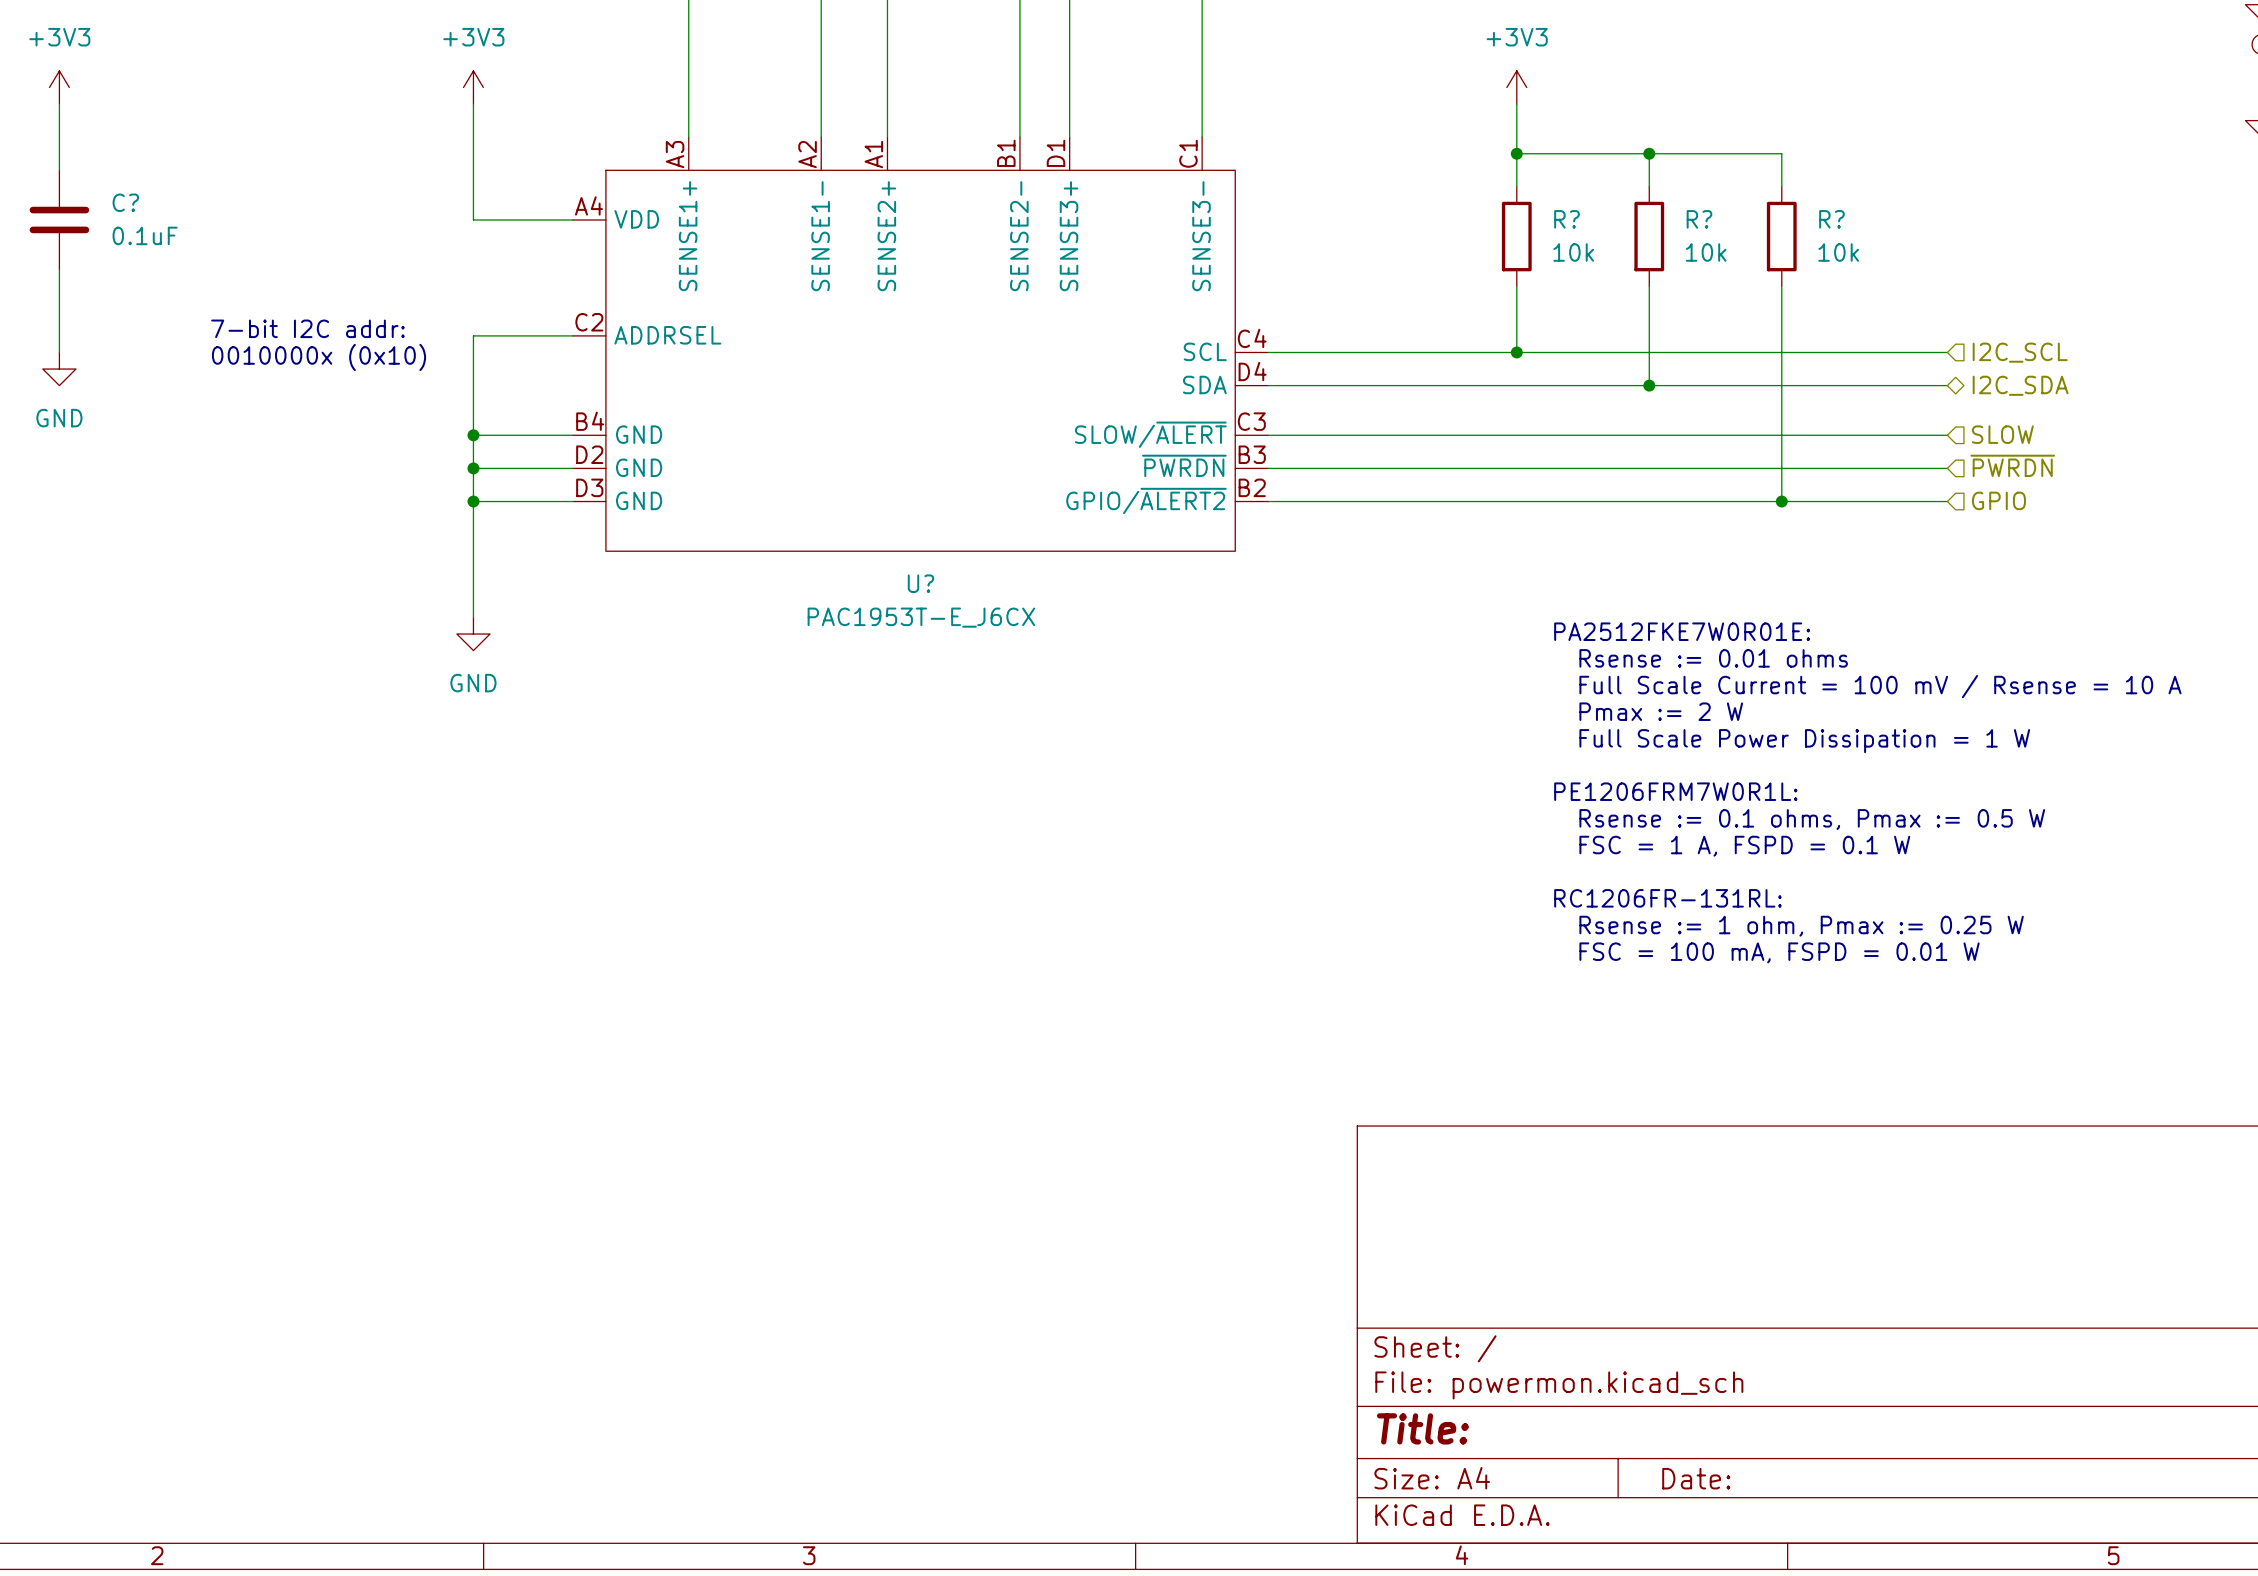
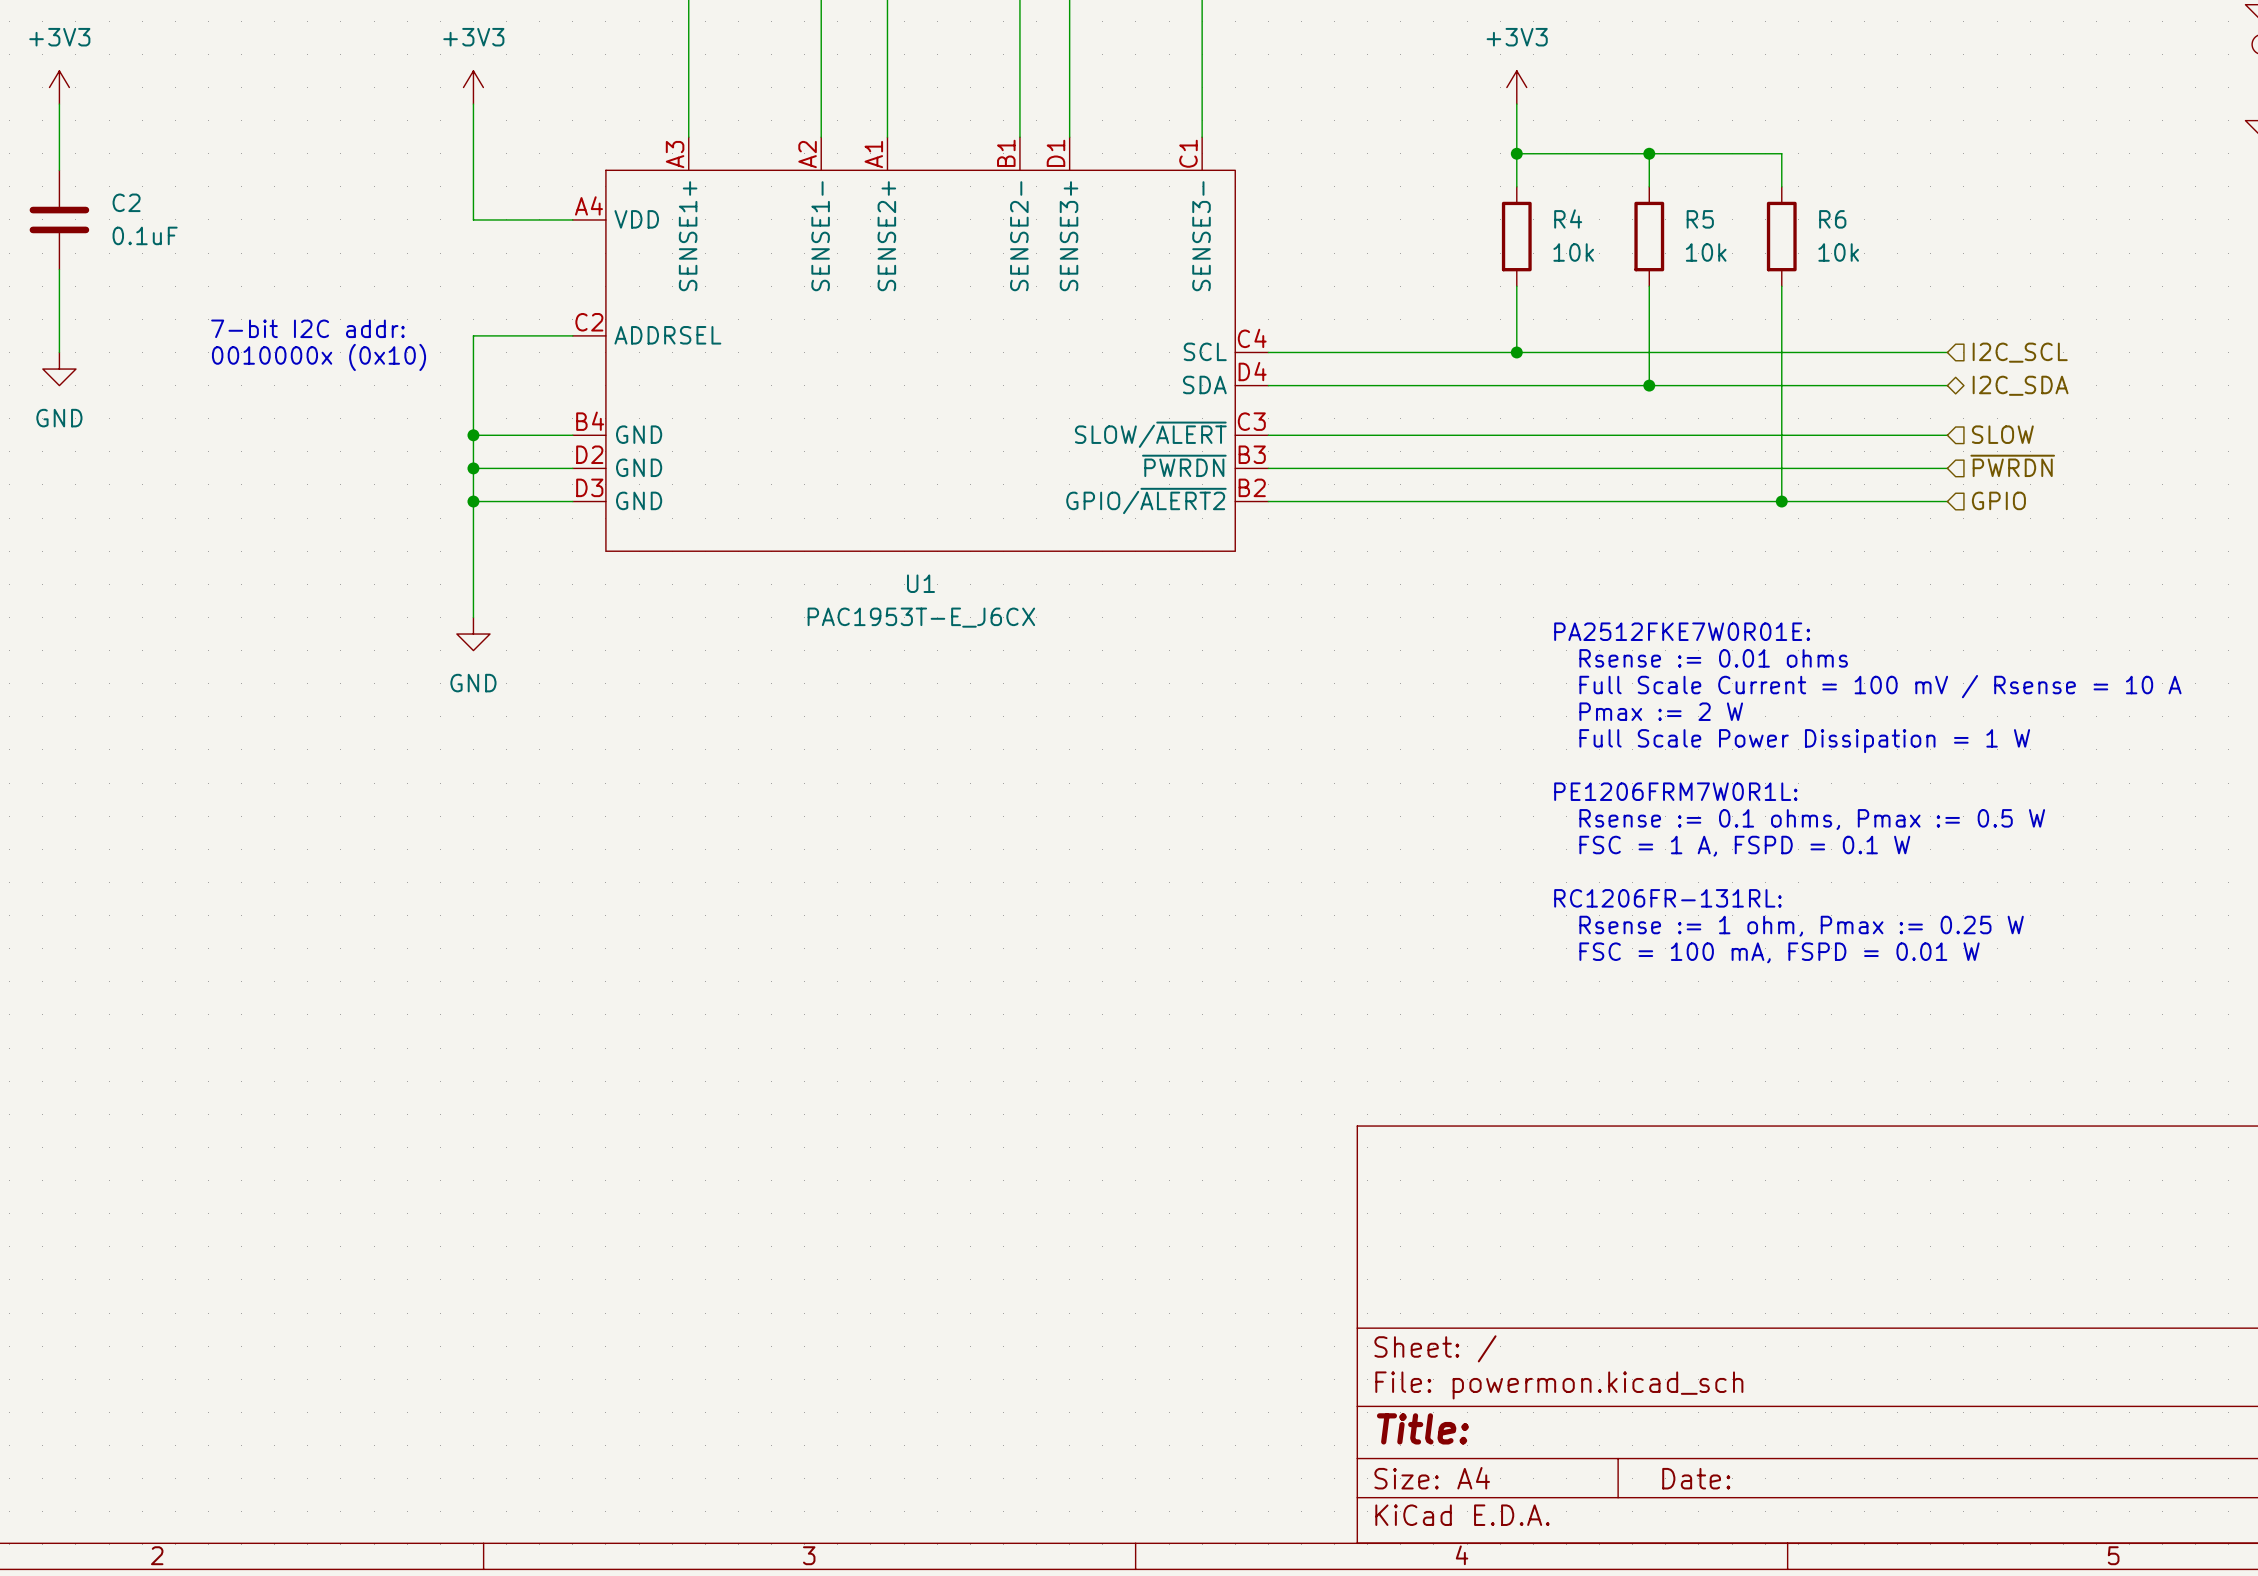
C? name: C? (125, 202) -> C2 (126, 202)
R? name: R? (1566, 219) -> R4 (1568, 218)
R? name: R? (1699, 219) -> R5 (1700, 219)
R? name: R? (1831, 219) -> R6 (1832, 219)
U? name: U? (920, 583) -> U1 (920, 583)

